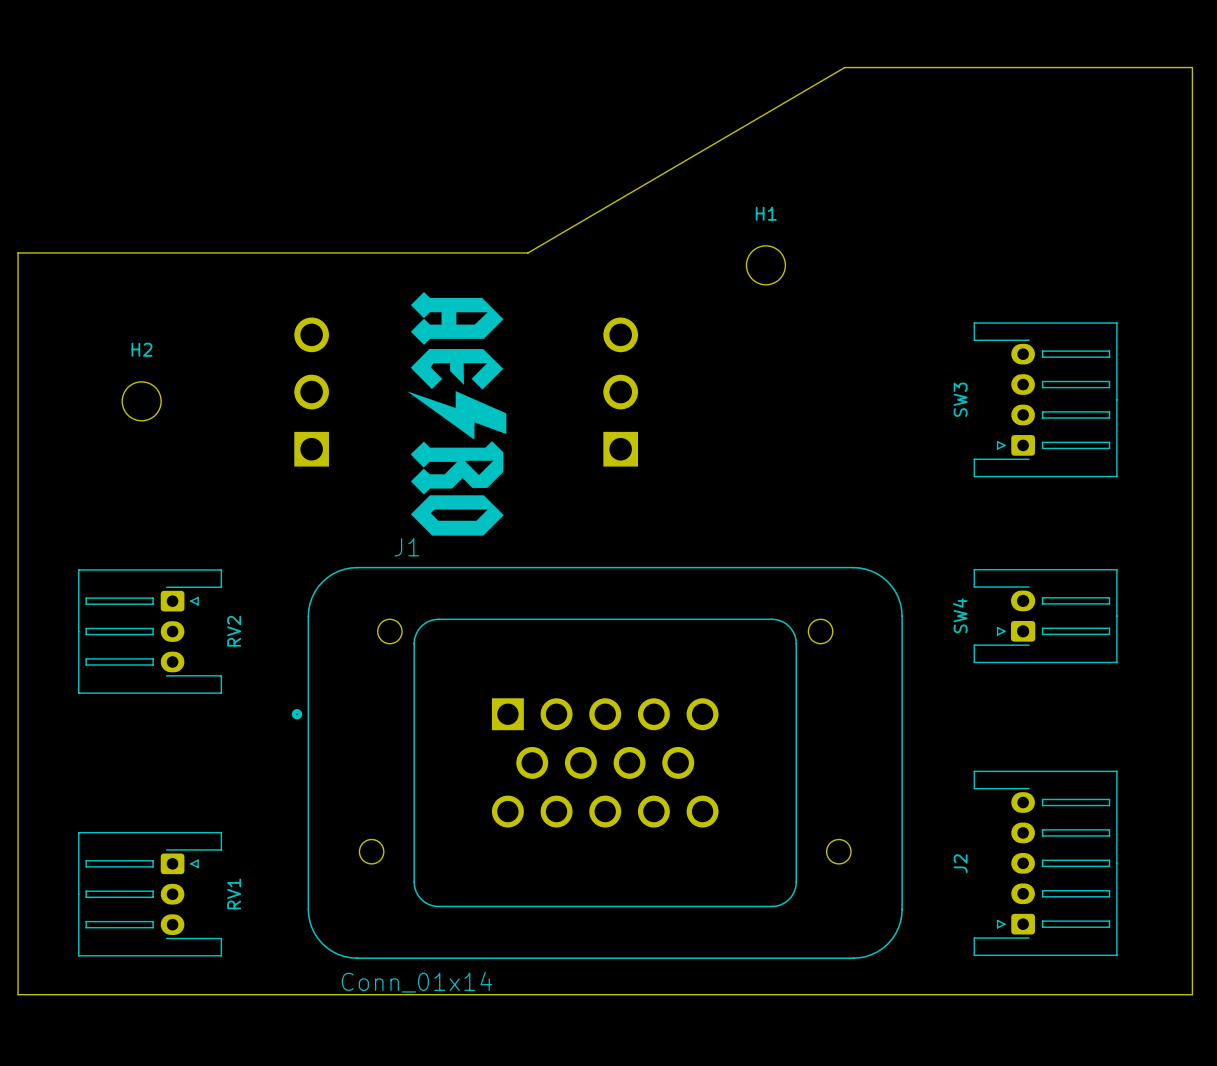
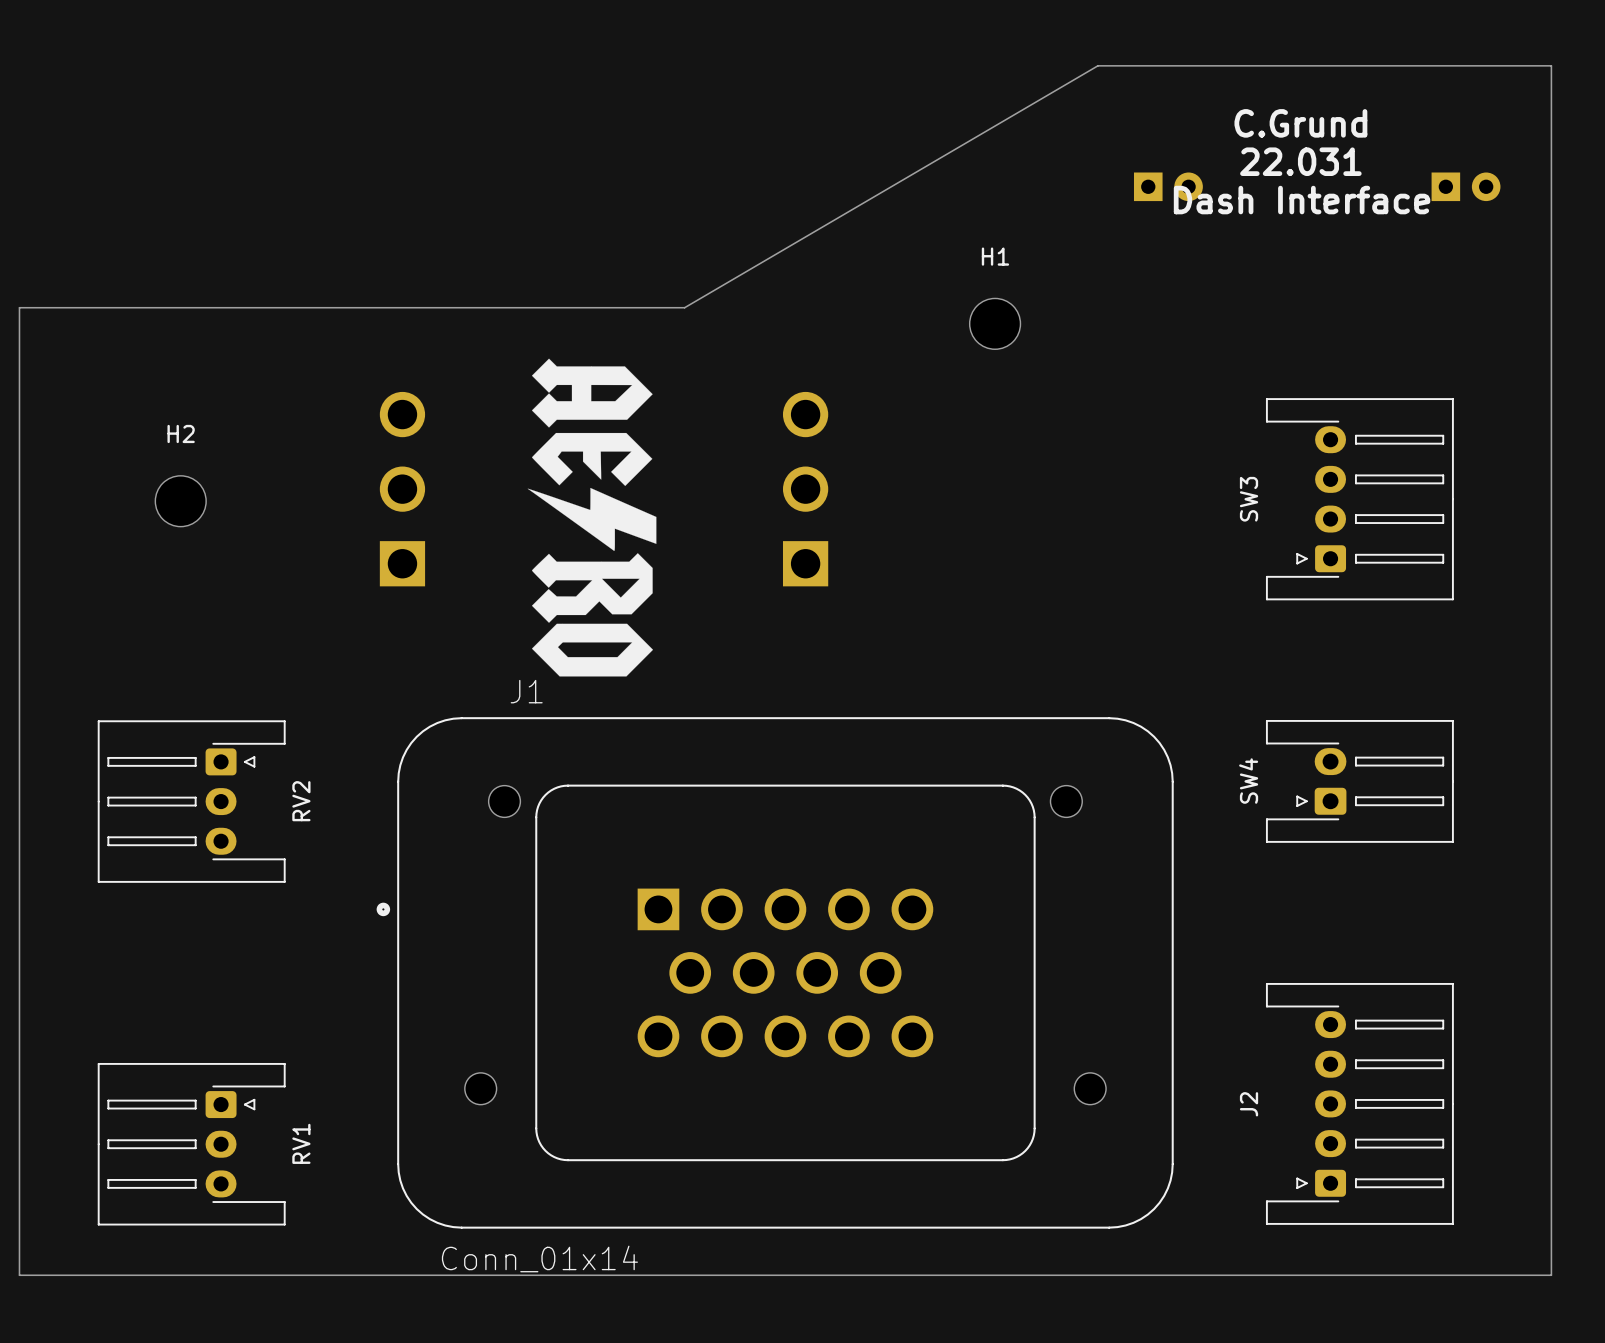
text: none -> C.Grund (1300, 123)
text: none -> 22.031 (1300, 161)
part: none -> (1168, 186)
part: none -> (1466, 186)
text: none -> Dash Interface (1302, 200)

